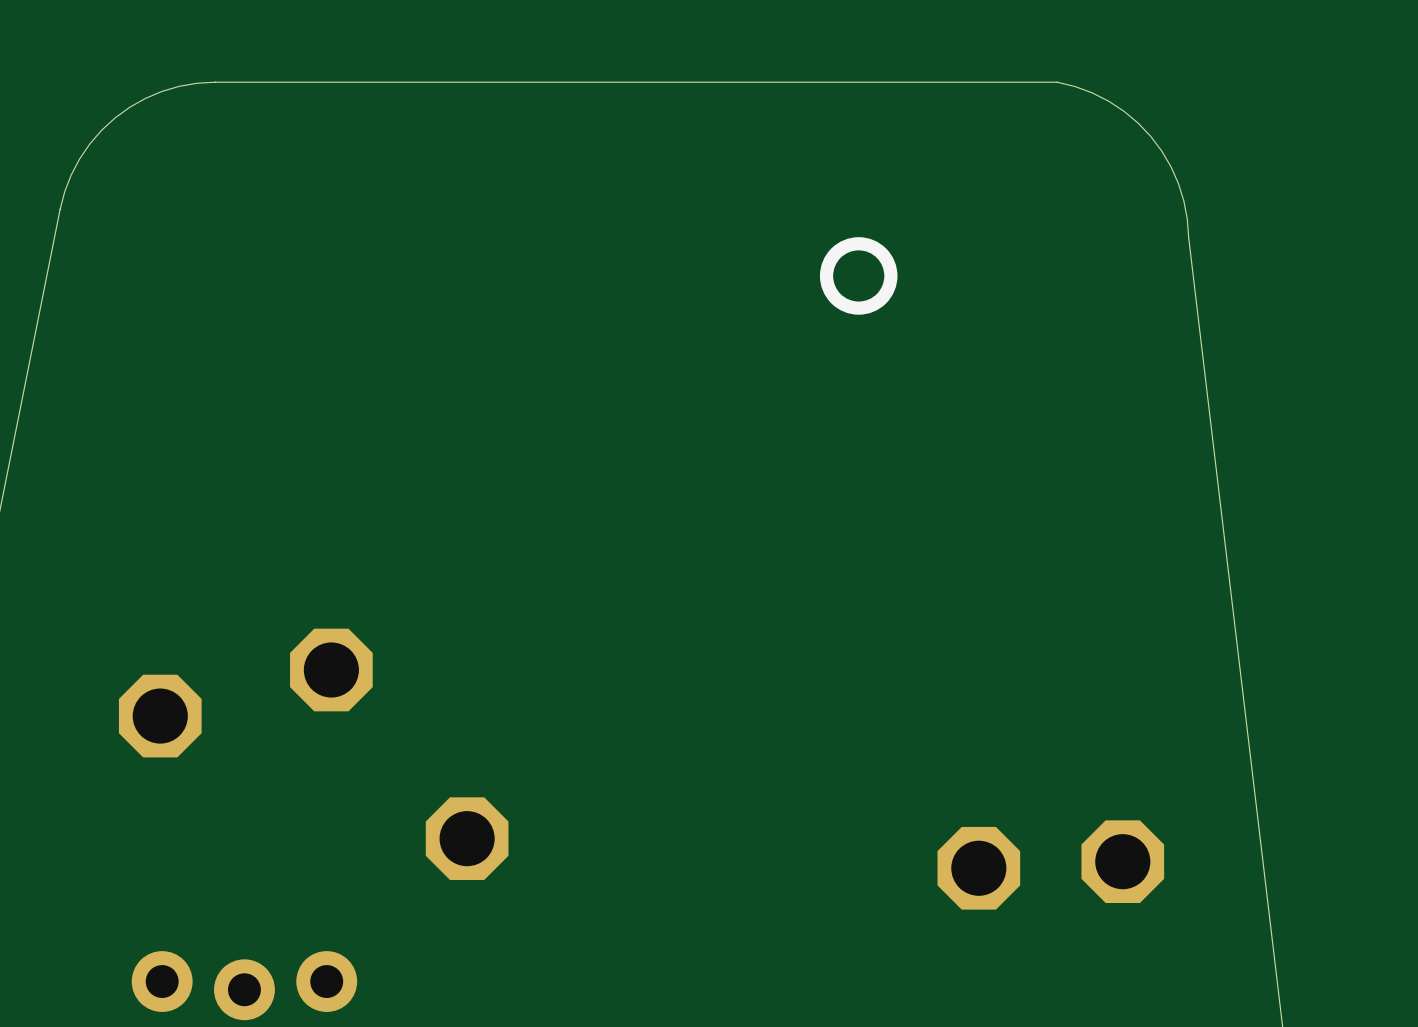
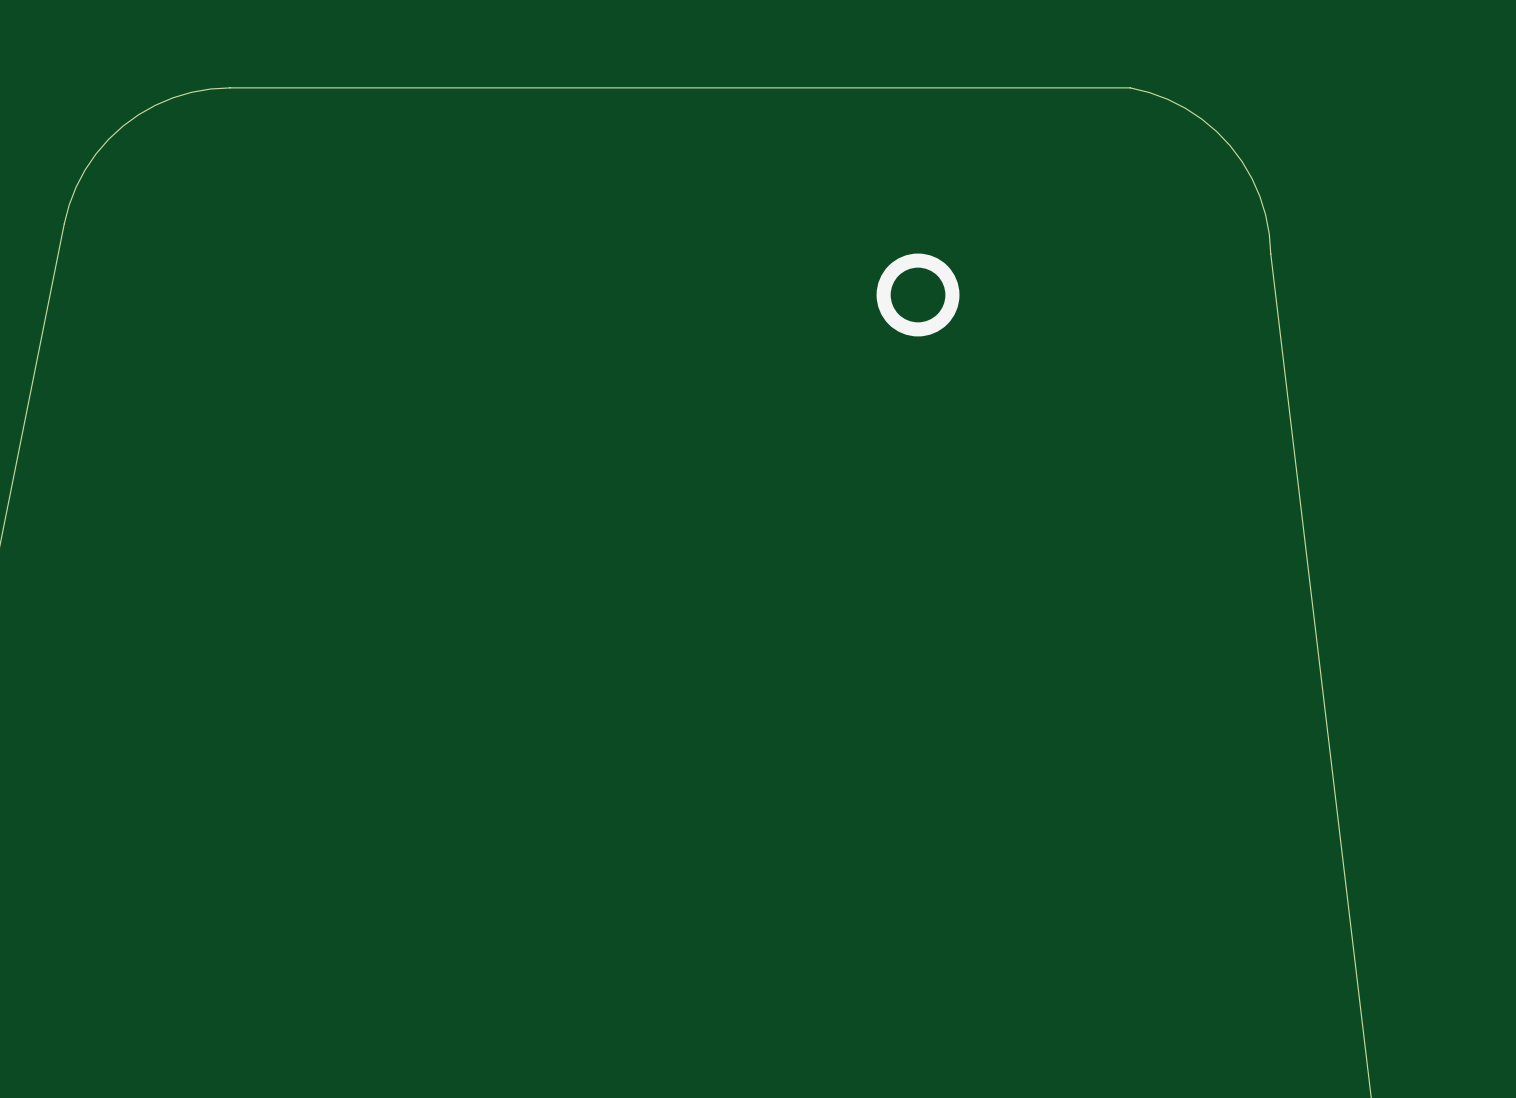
part: (331, 670) -> none
part: (160, 716) -> none
part: (467, 838) -> none
part: (1122, 861) -> none
part: (978, 868) -> none
part: (244, 985) -> none

